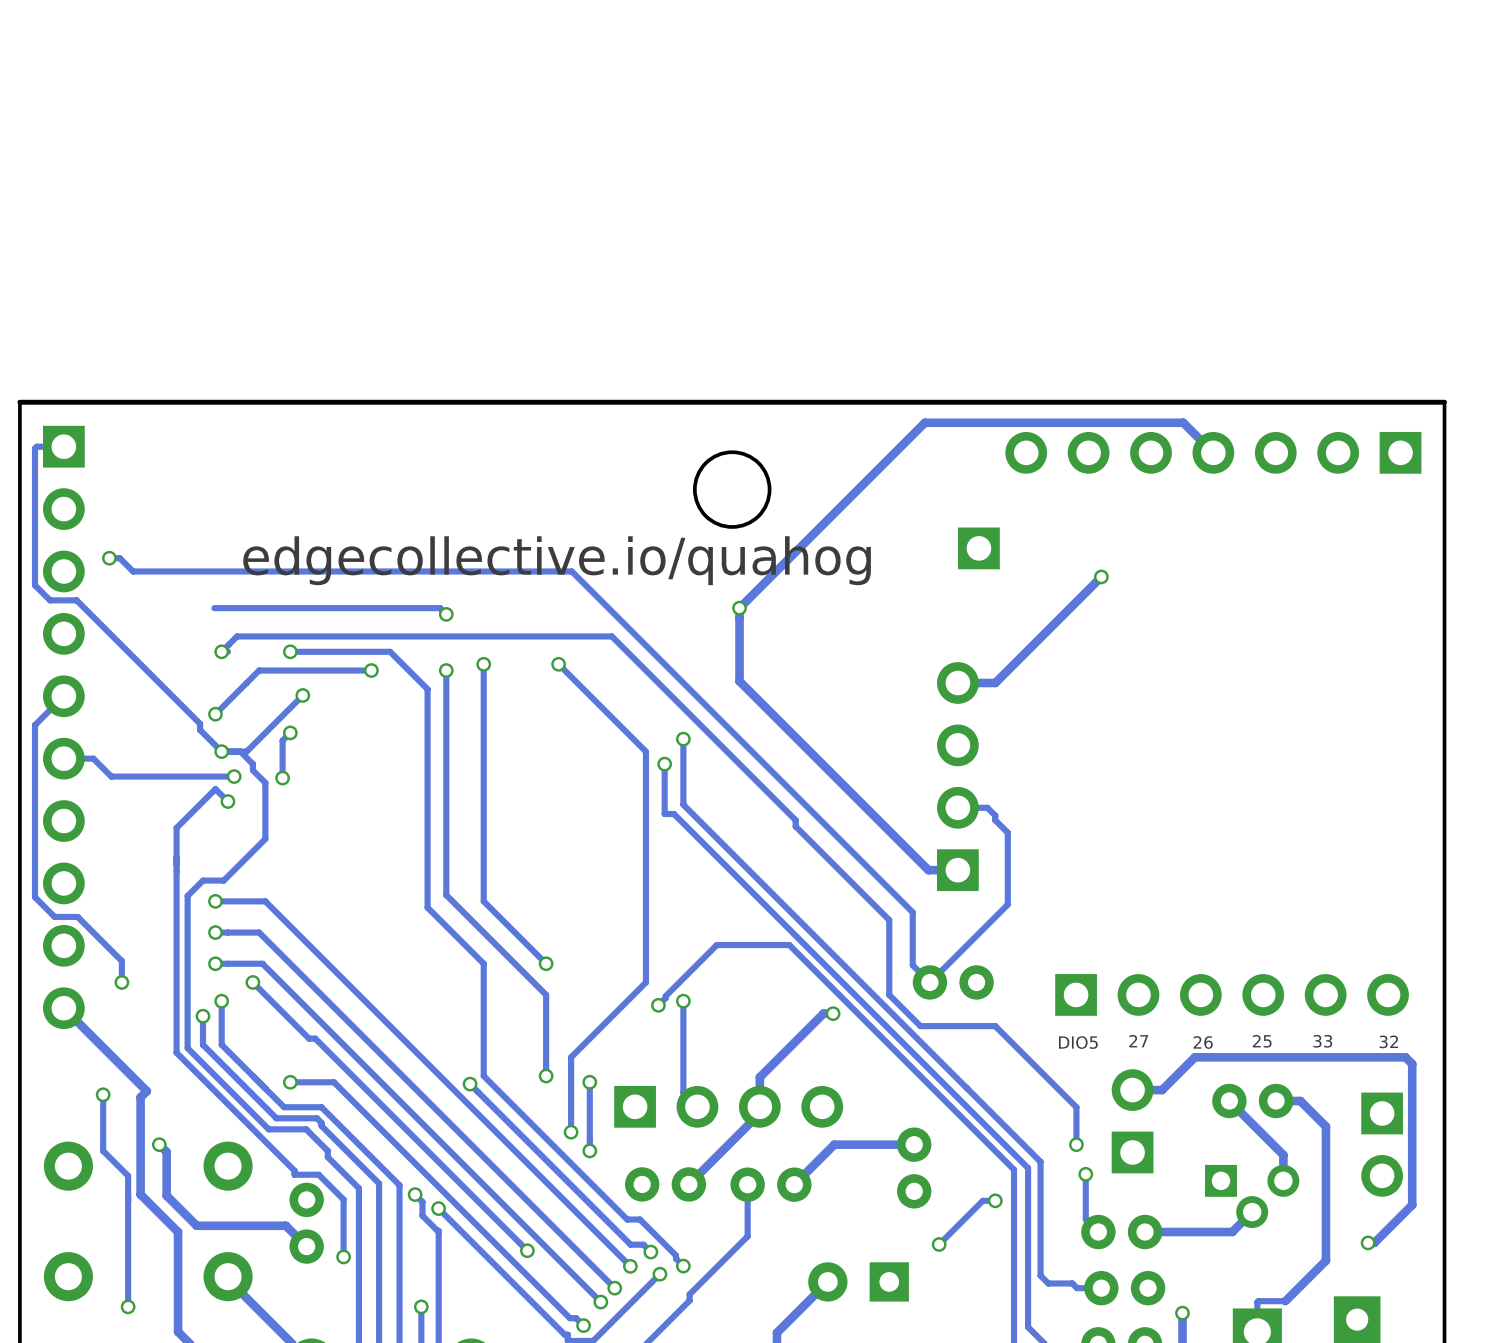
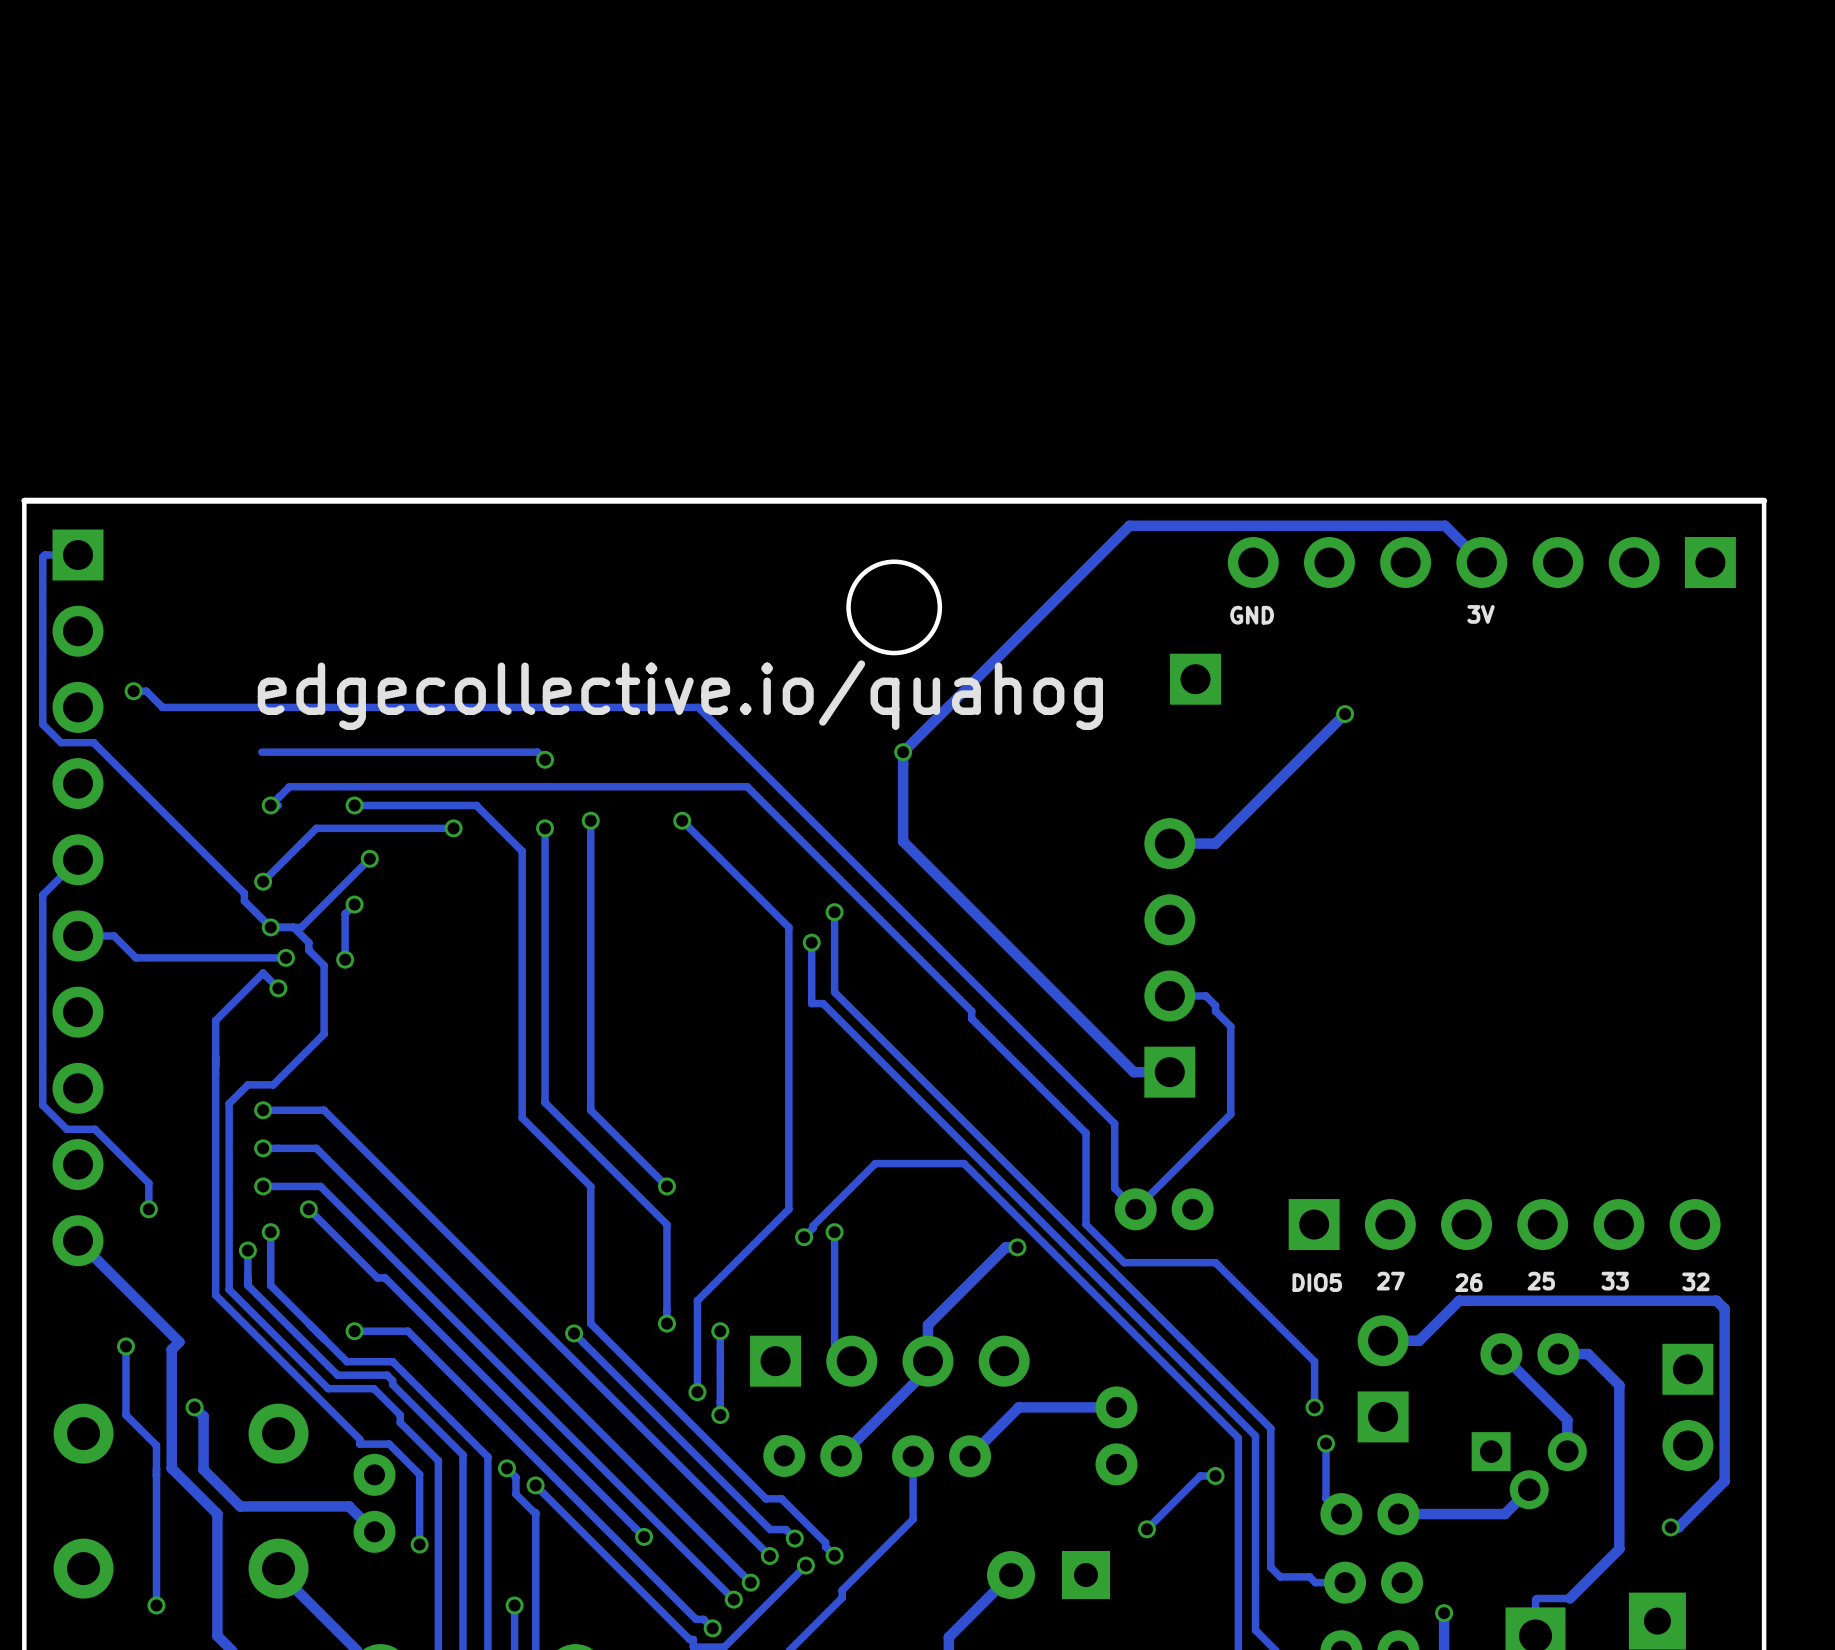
text: none -> 3V (1481, 614)
text: none -> GND (1252, 615)

